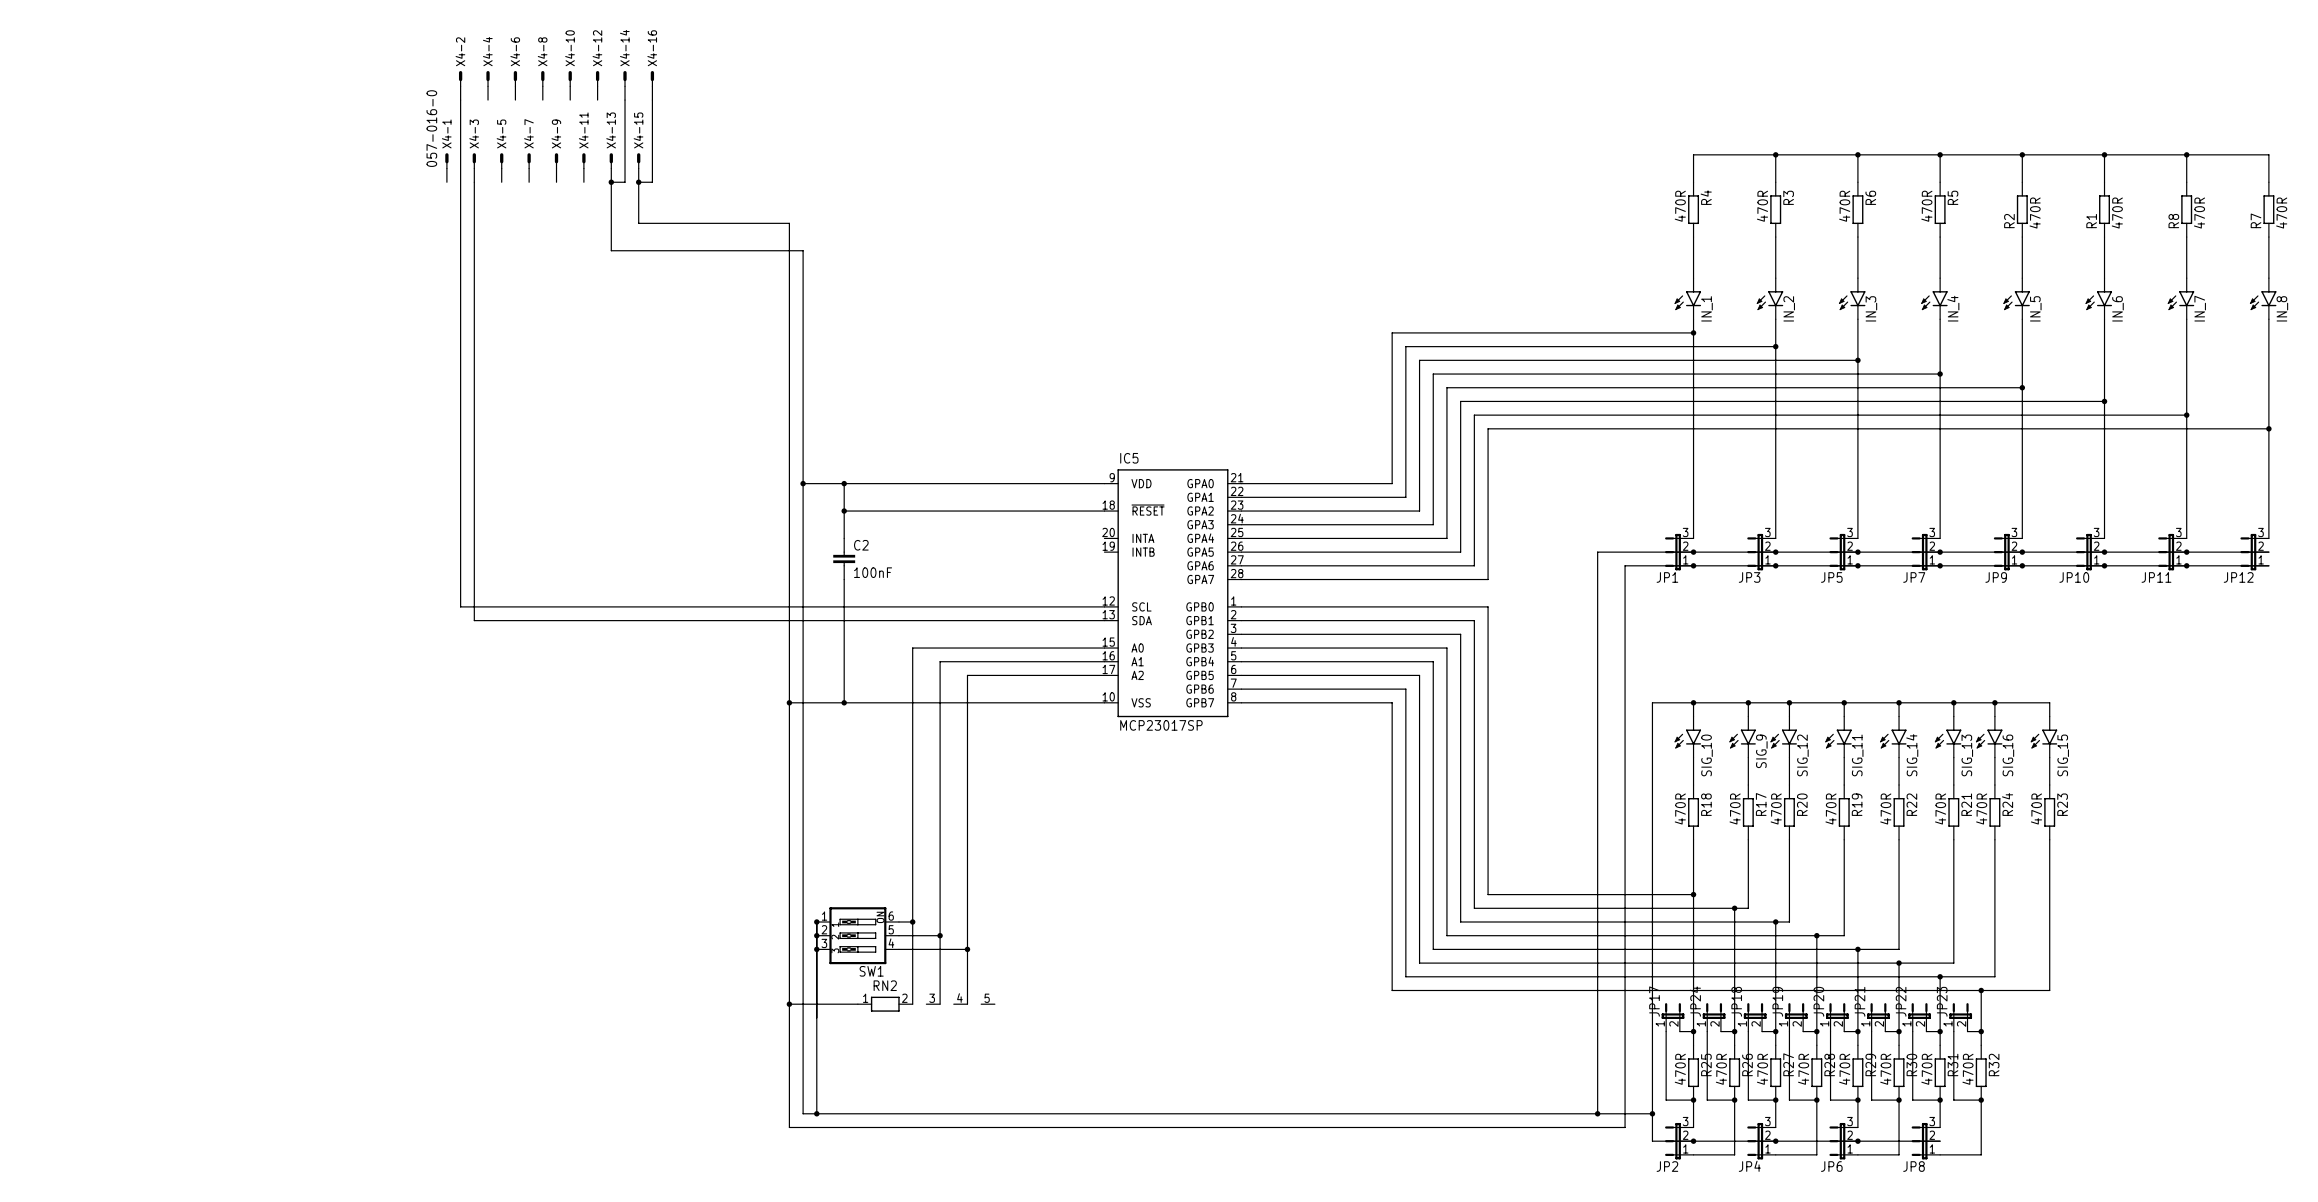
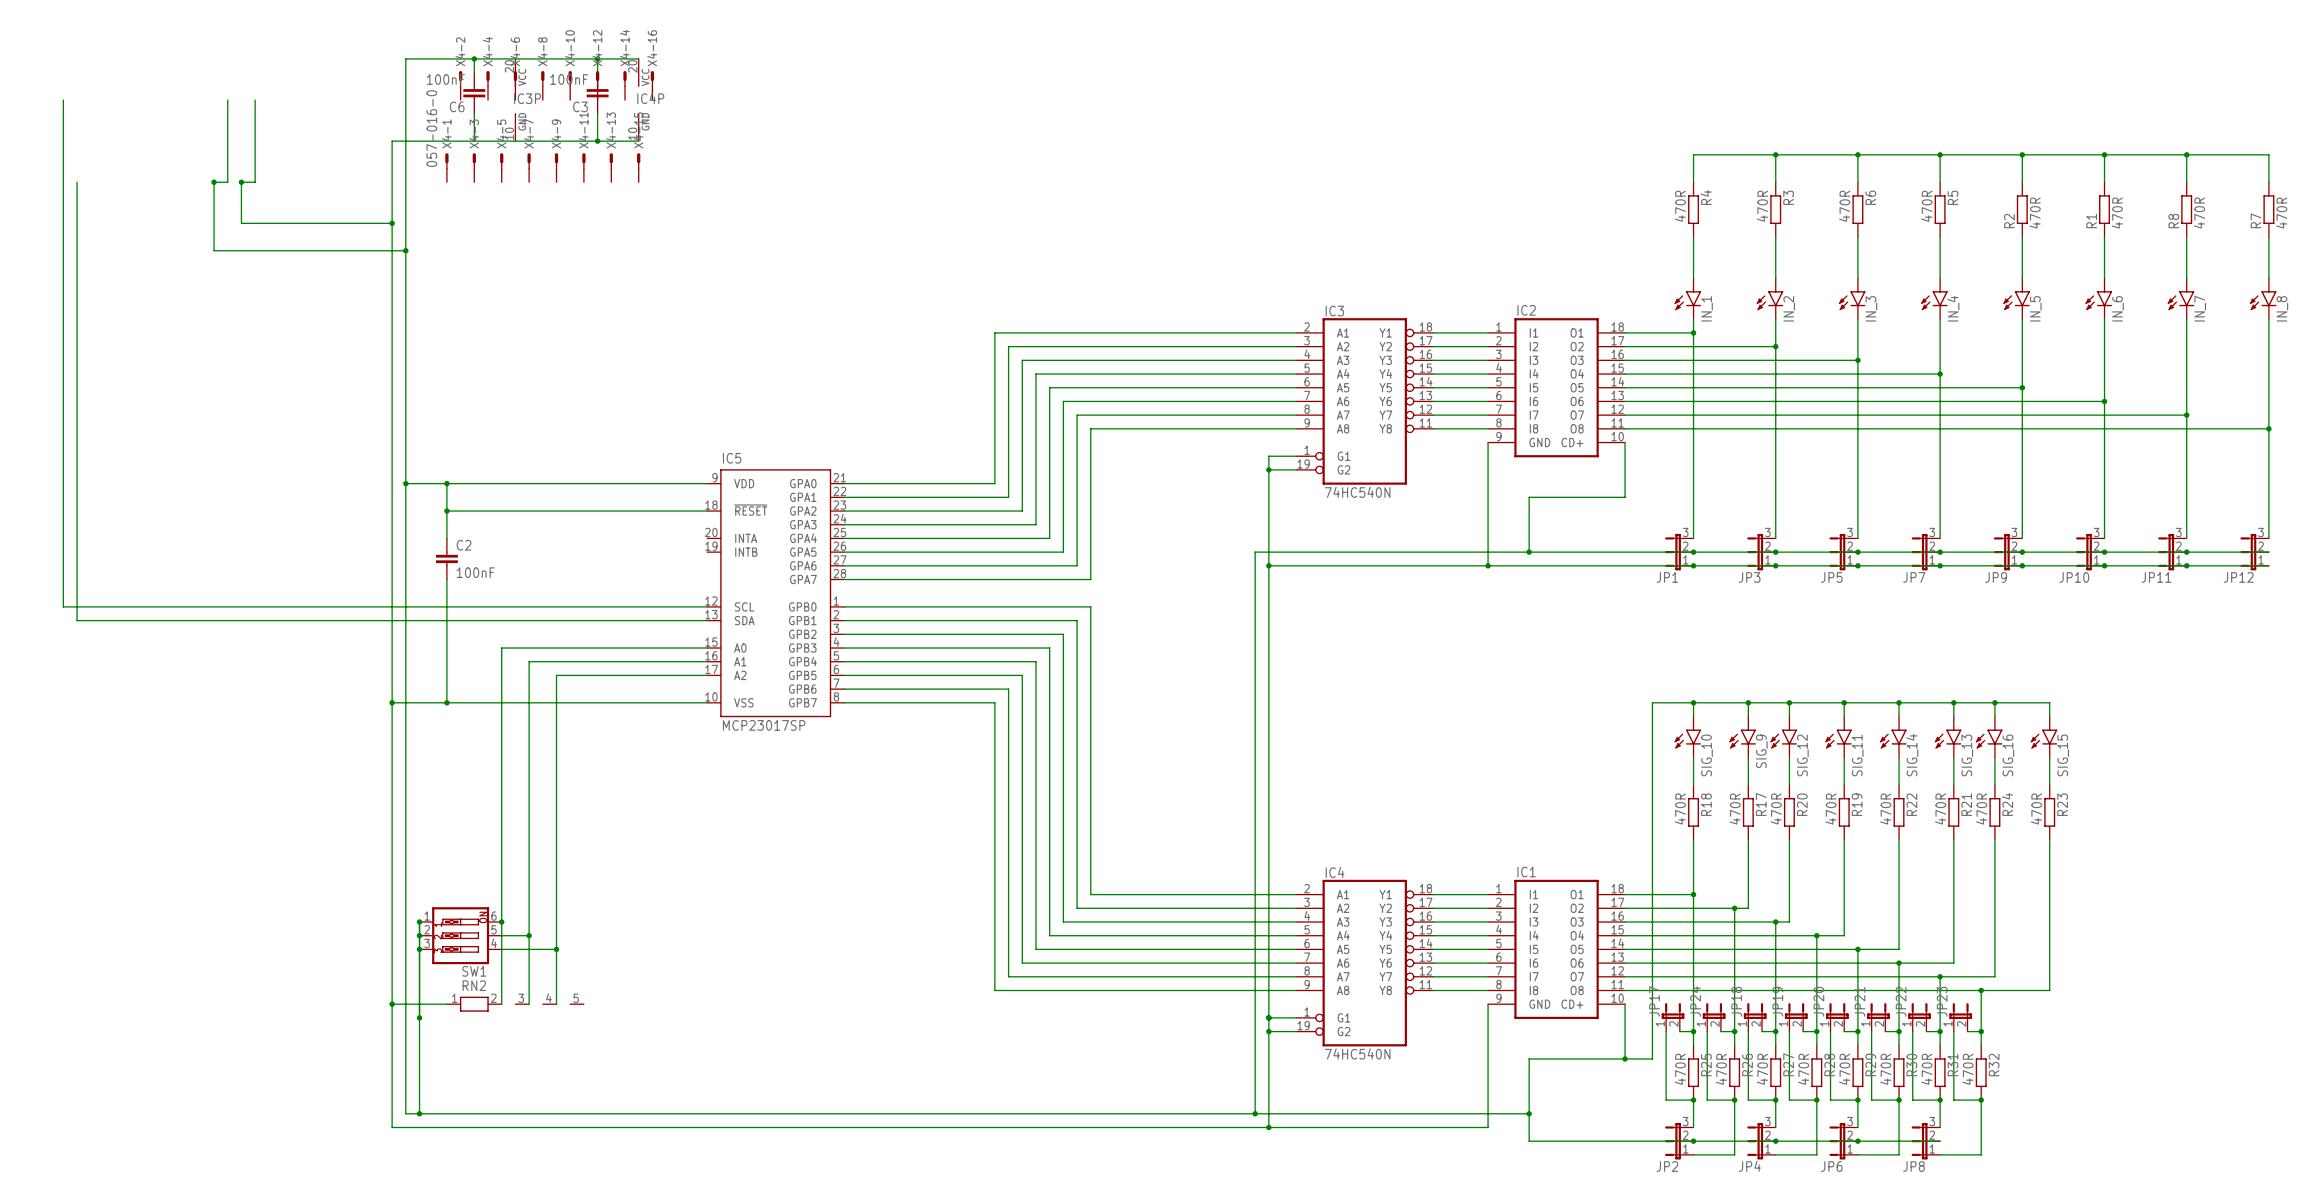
wire: none -> (474, 58) (474, 72)
junction: none -> (474, 58)
wire: none -> (597, 58) (597, 72)
junction: none -> (597, 58)
C6: none -> 100nF (474, 93)
C3: none -> 100nF (597, 93)
wire: none -> (227, 100) (227, 182) (214, 182) (214, 250) (405, 250)
wire: none -> (255, 100) (255, 182) (241, 182) (241, 223) (392, 223)
wire: (460, 100) (460, 606) -> (63, 100) (63, 606) (460, 606)
IC3P: none -> (515, 100)
wire: (625, 100) (625, 182) (611, 182) (611, 250) (803, 250) (803, 1113) -> (638, 58) (405, 58) (405, 1113) (803, 1113)
IC4P: none -> (638, 100)
wire: (652, 100) (652, 182) (638, 182) (638, 223) (789, 223) (789, 1127) -> (638, 141) (392, 141) (392, 1127) (789, 1127)
wire: none -> (474, 113) (474, 141)
wire: none -> (597, 113) (597, 141)
junction: none -> (597, 141)
junction: none -> (214, 182)
junction: none -> (241, 182)
wire: (474, 182) (474, 620) -> (77, 182) (77, 620) (474, 620)
junction: (611, 182) -> none
junction: (638, 182) -> none
junction: none -> (392, 223)
junction: none -> (405, 250)
wire: (1433, 332) (1392, 332) (1392, 483) (1241, 483) -> none
wire: (1488, 332) (1625, 332) -> none
wire: none -> (1296, 346) (1008, 346) (1008, 497) (844, 497)
wire: (1433, 346) (1405, 346) (1405, 497) (1241, 497) -> none
wire: (1488, 346) (1625, 346) -> none
wire: (1433, 360) (1419, 360) (1419, 511) (1241, 511) -> none
wire: (1488, 360) (1625, 360) -> none
wire: none -> (1296, 374) (1035, 374) (1035, 524) (844, 524)
wire: (1433, 374) (1433, 524) (1241, 524) -> none
wire: (1488, 374) (1625, 374) -> none
wire: (1446, 387) (1446, 538) (1241, 538) -> (1446, 387) (1433, 387)
wire: (1488, 387) (1625, 387) -> none
IC2: none -> (1556, 387)
wire: none -> (1296, 401) (1063, 401) (1063, 552) (844, 552)
IC3: none -> 74HC540N (1364, 401)
wire: (1460, 401) (1460, 552) -> (1460, 401) (1433, 401)
wire: (1488, 401) (1625, 401) -> none
wire: none -> (1296, 415) (1077, 415) (1077, 565) (844, 565)
wire: (1474, 415) (1474, 565) -> (1474, 415) (1433, 415)
wire: (1488, 415) (1625, 415) -> none
wire: none -> (1433, 428) (1488, 428)
wire: (1625, 428) (1488, 428) (1488, 442) -> none
wire: none -> (1625, 442) (1625, 497) (1529, 497) (1529, 552)
wire: none -> (1296, 456) (1268, 456) (1268, 1127)
junction: none -> (1268, 469)
wire: none -> (405, 483) (707, 483)
junction: none -> (405, 483)
wire: none -> (446, 483) (446, 538)
junction: none -> (446, 483)
wire: (803, 483) (844, 483) (844, 538) -> (1296, 387) (1049, 387) (1049, 538) (844, 538)
junction: (803, 483) -> none
junction: (844, 483) -> none
wire: (994, 483) (1104, 483) -> (994, 483) (994, 332) (1296, 332)
wire: none -> (446, 511) (707, 511)
junction: none -> (446, 511)
junction: (844, 511) -> none
wire: (1022, 511) (1104, 511) -> (1022, 511) (1022, 360) (1296, 360)
wire: (1241, 552) (1255, 552) -> (1255, 1113) (1255, 552)
junction: none -> (1529, 552)
wire: (1597, 552) (1597, 1113) -> (1597, 552) (1460, 552)
C2 position: (844, 558) -> (446, 558)
wire: (1241, 565) (1268, 565) -> (1268, 469) (1296, 469)
junction: none -> (1268, 565)
wire: (1488, 565) (1488, 579) (1241, 579) -> none
junction: none -> (1488, 565)
wire: (1625, 565) (1625, 1004) -> (1625, 565) (1474, 565)
wire: none -> (446, 579) (446, 702)
wire: (844, 579) (844, 702) (789, 702) -> (844, 579) (1090, 579) (1090, 428) (1296, 428)
IC5 position: (1172, 593) -> (775, 593)
wire: (707, 606) (844, 606) -> none
wire: (1090, 606) (1104, 606) -> (1090, 606) (1090, 894) (1296, 894)
wire: (1241, 606) (1488, 606) (1488, 894) (1625, 894) -> none
wire: (707, 620) (844, 620) -> none
wire: (1077, 620) (1104, 620) -> (1077, 620) (1077, 908) (1296, 908)
wire: (1241, 620) (1474, 620) (1474, 908) -> (1433, 908) (1474, 908)
wire: none -> (844, 634) (1063, 634) (1063, 922) (1296, 922)
wire: (1241, 634) (1460, 634) (1460, 922) -> (1433, 922) (1460, 922)
wire: none -> (707, 648) (501, 648) (501, 1004)
wire: (912, 648) (912, 1004) -> (912, 648) (844, 648)
wire: (1049, 648) (1104, 648) -> (1049, 648) (1049, 935) (1296, 935)
wire: (1241, 648) (1446, 648) (1446, 935) -> (1433, 935) (1446, 935)
wire: none -> (707, 661) (529, 661) (529, 1004)
wire: (940, 661) (940, 1004) -> (940, 661) (844, 661)
wire: (1035, 661) (1104, 661) -> (1035, 661) (1035, 949) (1296, 949)
wire: (1241, 661) (1433, 661) (1433, 949) -> none
wire: none -> (707, 675) (556, 675) (556, 1004)
wire: (967, 675) (967, 1004) -> (967, 675) (844, 675)
wire: (1022, 675) (1104, 675) -> (1022, 675) (1022, 963) (1296, 963)
wire: (1241, 675) (1419, 675) (1419, 963) (1433, 963) -> none
wire: none -> (844, 689) (1008, 689) (1008, 976) (1296, 976)
wire: (1241, 689) (1405, 689) (1405, 976) (1433, 976) -> none
wire: none -> (392, 702) (707, 702)
junction: none -> (392, 702)
junction: none -> (446, 702)
junction: (789, 702) -> none
junction: (844, 702) -> none
wire: (994, 702) (1104, 702) -> (994, 702) (994, 990) (1296, 990)
wire: (1241, 702) (1392, 702) (1392, 990) (1433, 990) -> none
wire: none -> (1433, 894) (1488, 894)
wire: (1488, 908) (1625, 908) -> none
wire: none -> (419, 922) (419, 1113)
junction: none -> (419, 922)
junction: none -> (501, 922)
wire: (816, 922) (816, 1113) -> none
junction: (816, 922) -> none
wire: (898, 922) (912, 922) -> none
junction: (912, 922) -> none
wire: (1488, 922) (1625, 922) -> none
junction: none -> (419, 935)
wire: none -> (501, 935) (529, 935)
junction: none -> (529, 935)
junction: (816, 935) -> none
SW1 position: (857, 935) -> (460, 935)
wire: (898, 935) (940, 935) -> none
junction: (940, 935) -> none
wire: (1488, 935) (1625, 935) -> none
junction: none -> (419, 949)
wire: none -> (501, 949) (556, 949)
junction: none -> (556, 949)
junction: (816, 949) -> none
wire: (898, 949) (967, 949) -> none
junction: (967, 949) -> none
wire: (1488, 949) (1625, 949) -> none
IC1: none -> (1556, 949)
IC4: none -> 74HC540N (1364, 963)
wire: (1488, 963) (1625, 963) -> none
wire: (1488, 976) (1625, 976) -> none
wire: (1488, 990) (1625, 990) -> none
wire: none -> (392, 1004) (446, 1004)
junction: none -> (392, 1004)
wire: (789, 1004) (857, 1004) -> none
junction: (789, 1004) -> none
RN2 position: (926, 1004) -> (515, 1004)
junction: none -> (419, 1017)
wire: none -> (1268, 1017) (1296, 1017)
junction: none -> (1268, 1017)
wire: none -> (1268, 1031) (1296, 1031)
junction: none -> (1268, 1031)
wire: (1625, 1058) (1625, 1127) (1488, 1127) -> (1488, 1004) (1488, 1127)
junction: none -> (1625, 1058)
wire: (1652, 1058) (1652, 1141) -> (1652, 1058) (1529, 1058) (1529, 1141) (1652, 1141)
junction: none -> (419, 1113)
junction: (816, 1113) -> none
junction: none -> (1255, 1113)
wire: (1529, 1113) (1652, 1113) -> none
junction: none -> (1529, 1113)
junction: (1597, 1113) -> none
junction: (1652, 1113) -> none
junction: none -> (1268, 1127)

